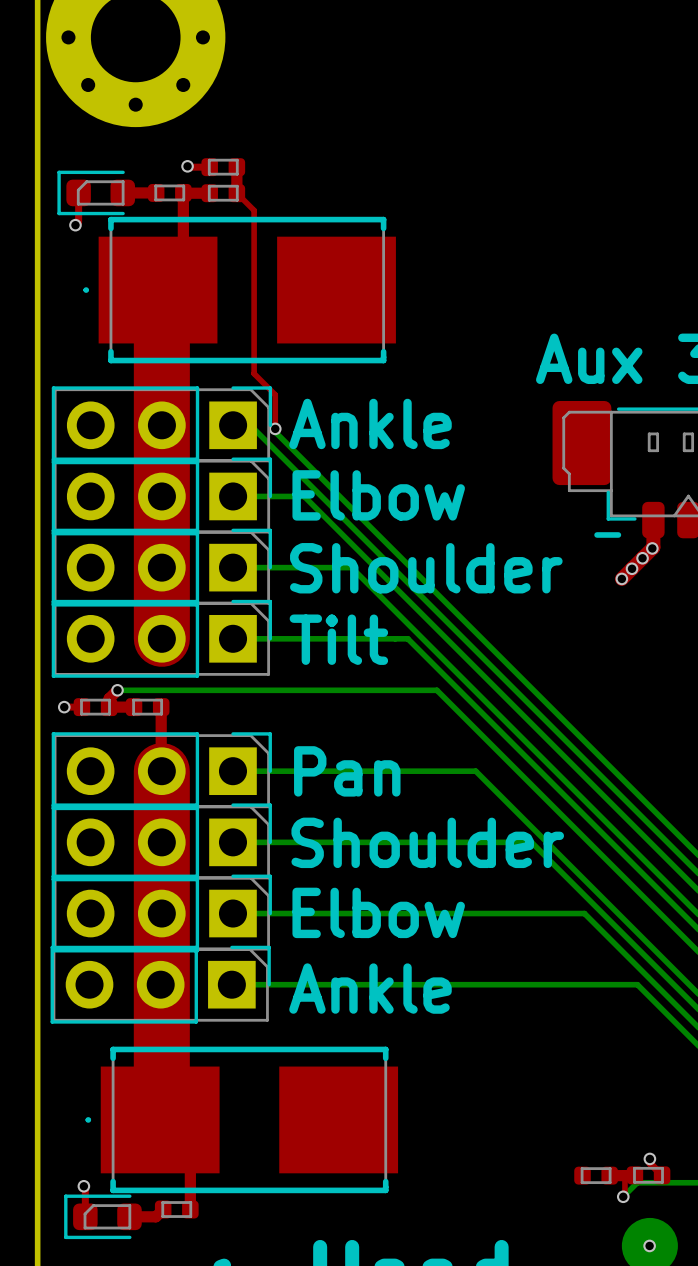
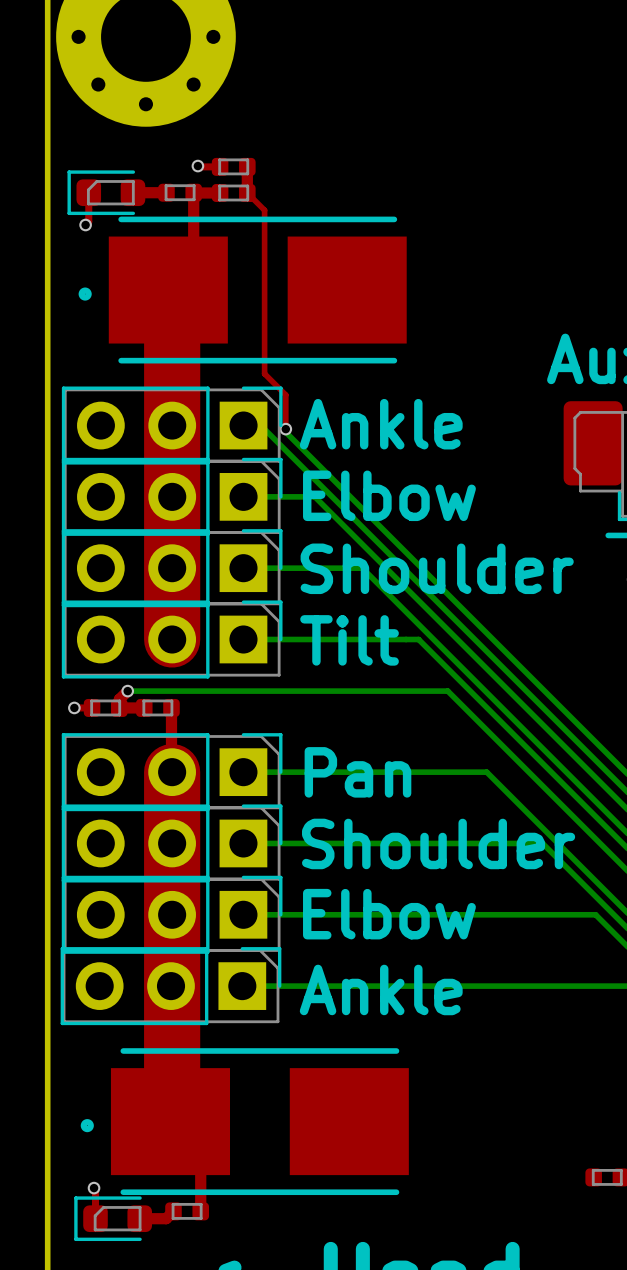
part footprint: [83, 216, 396, 364] -> [78, 216, 407, 364]
part footprint: [85, 1046, 399, 1194] -> [80, 1048, 409, 1196]

